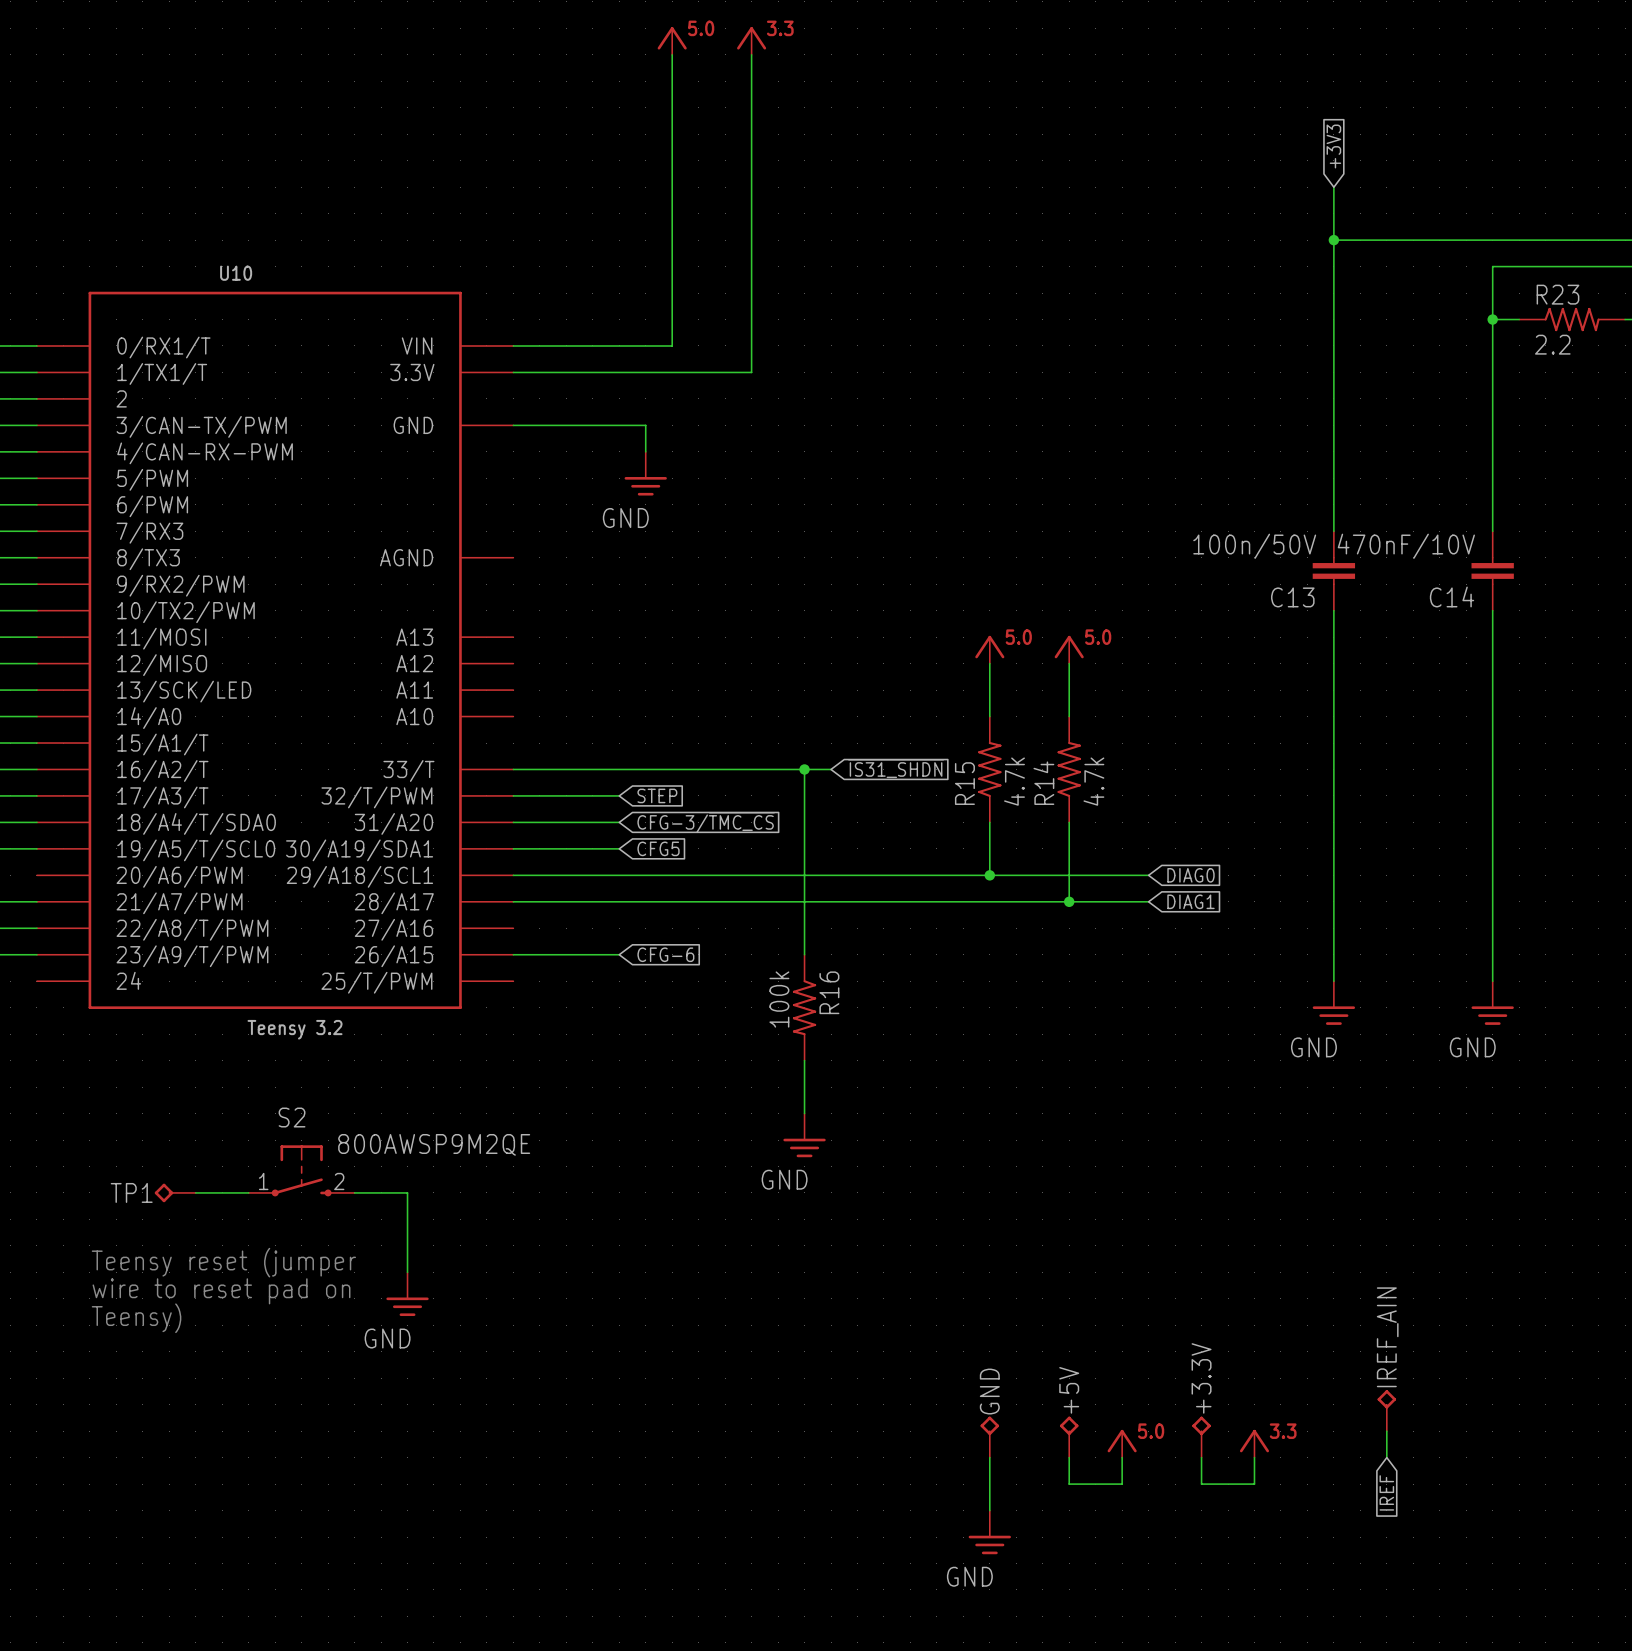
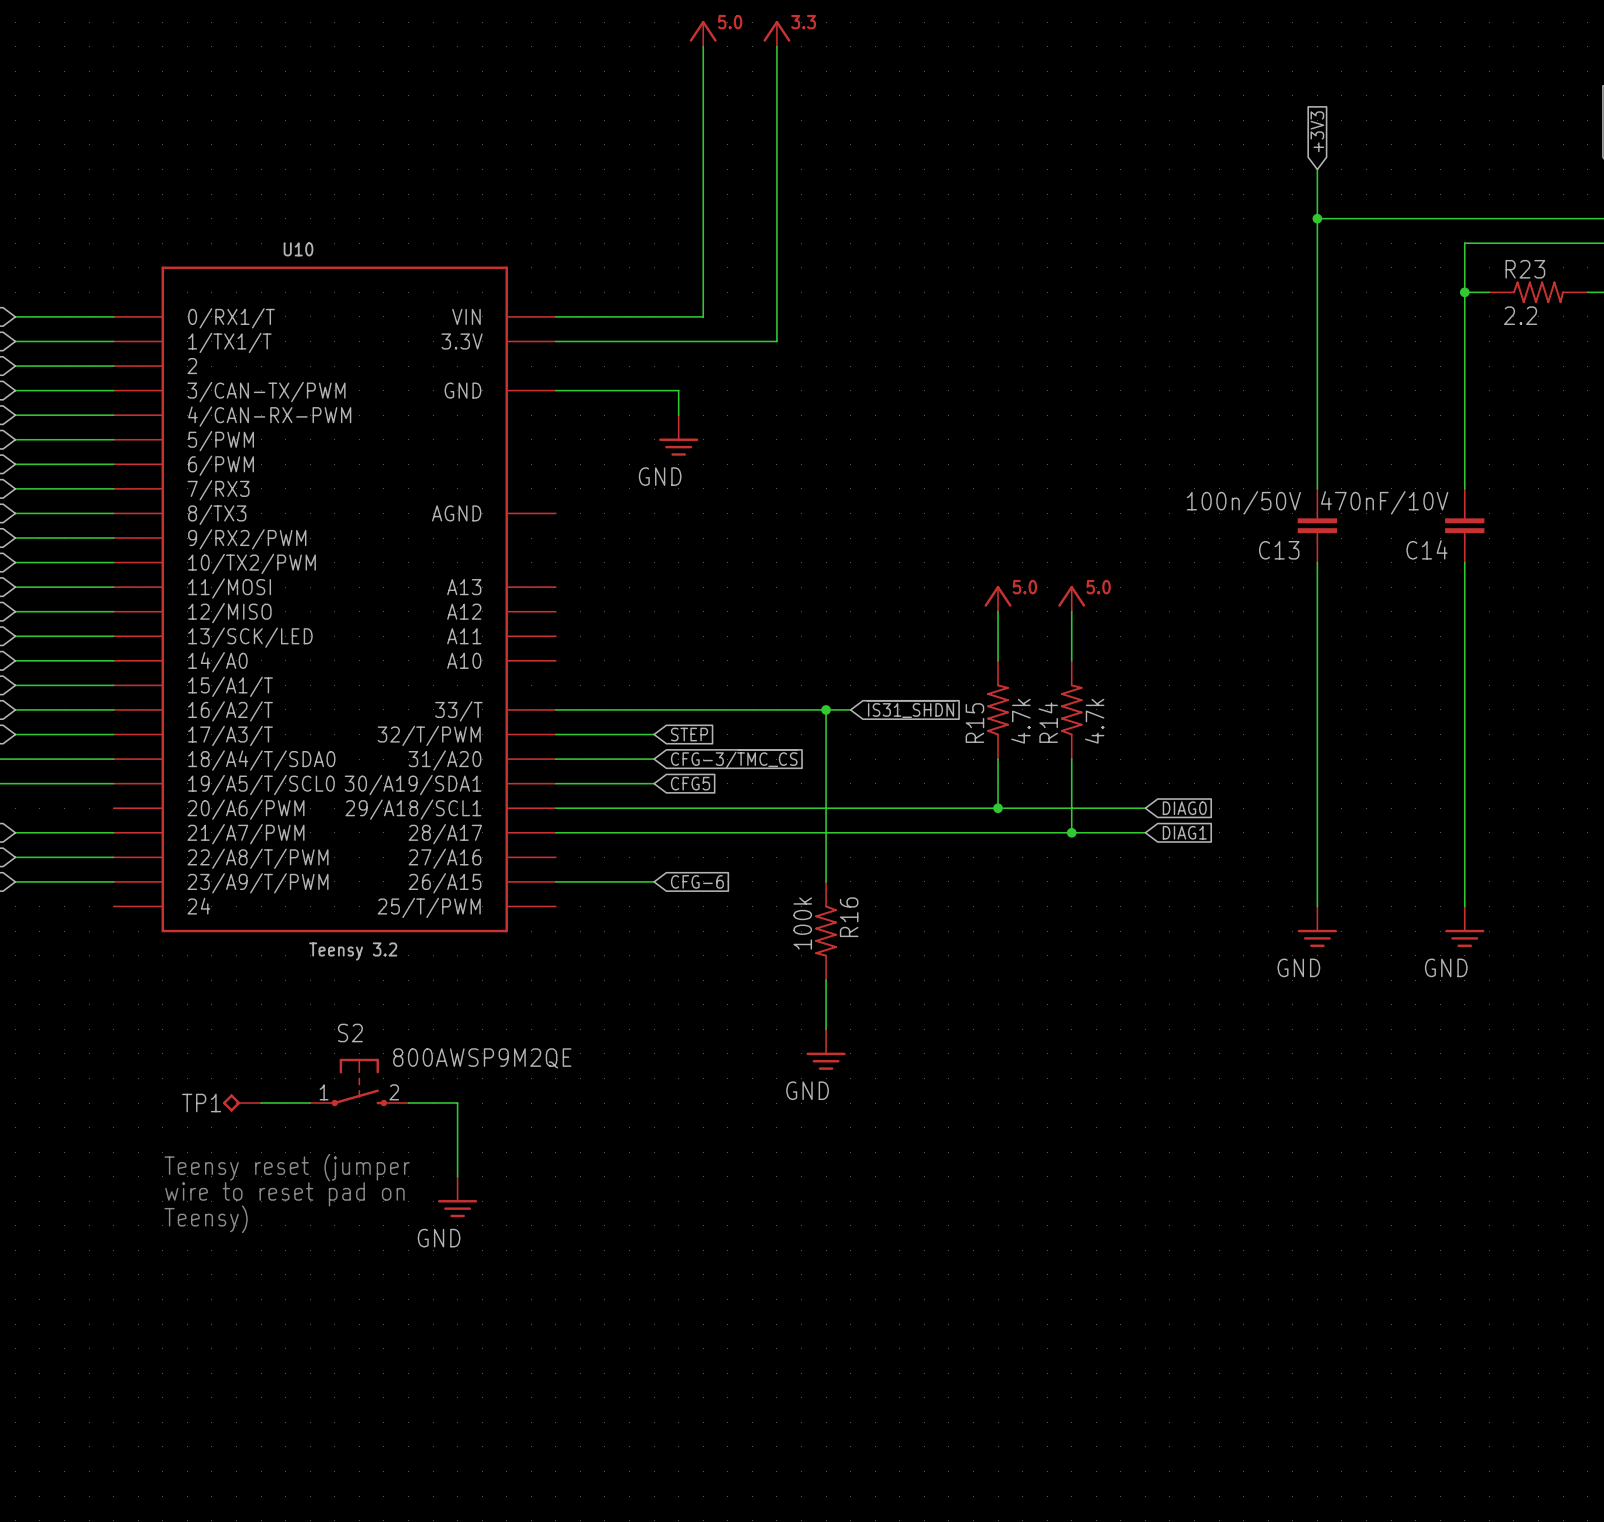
IREF_AIN: (1386, 1410) -> none
wire: (1386, 1431) (1386, 1457) -> none
GND: (989, 1437) -> none
+5V: (1069, 1437) -> none
+3.3V: (1201, 1437) -> none
power symbol: (1122, 1443) -> none
power symbol: (1254, 1443) -> none
wire: (989, 1457) (989, 1510) -> none
wire: (1069, 1457) (1069, 1484) (1122, 1484) (1122, 1457) -> none
wire: (1201, 1457) (1201, 1484) (1254, 1484) (1254, 1457) -> none
global label: IREF (1386, 1492) -> none
power symbol: GND (989, 1532) -> none

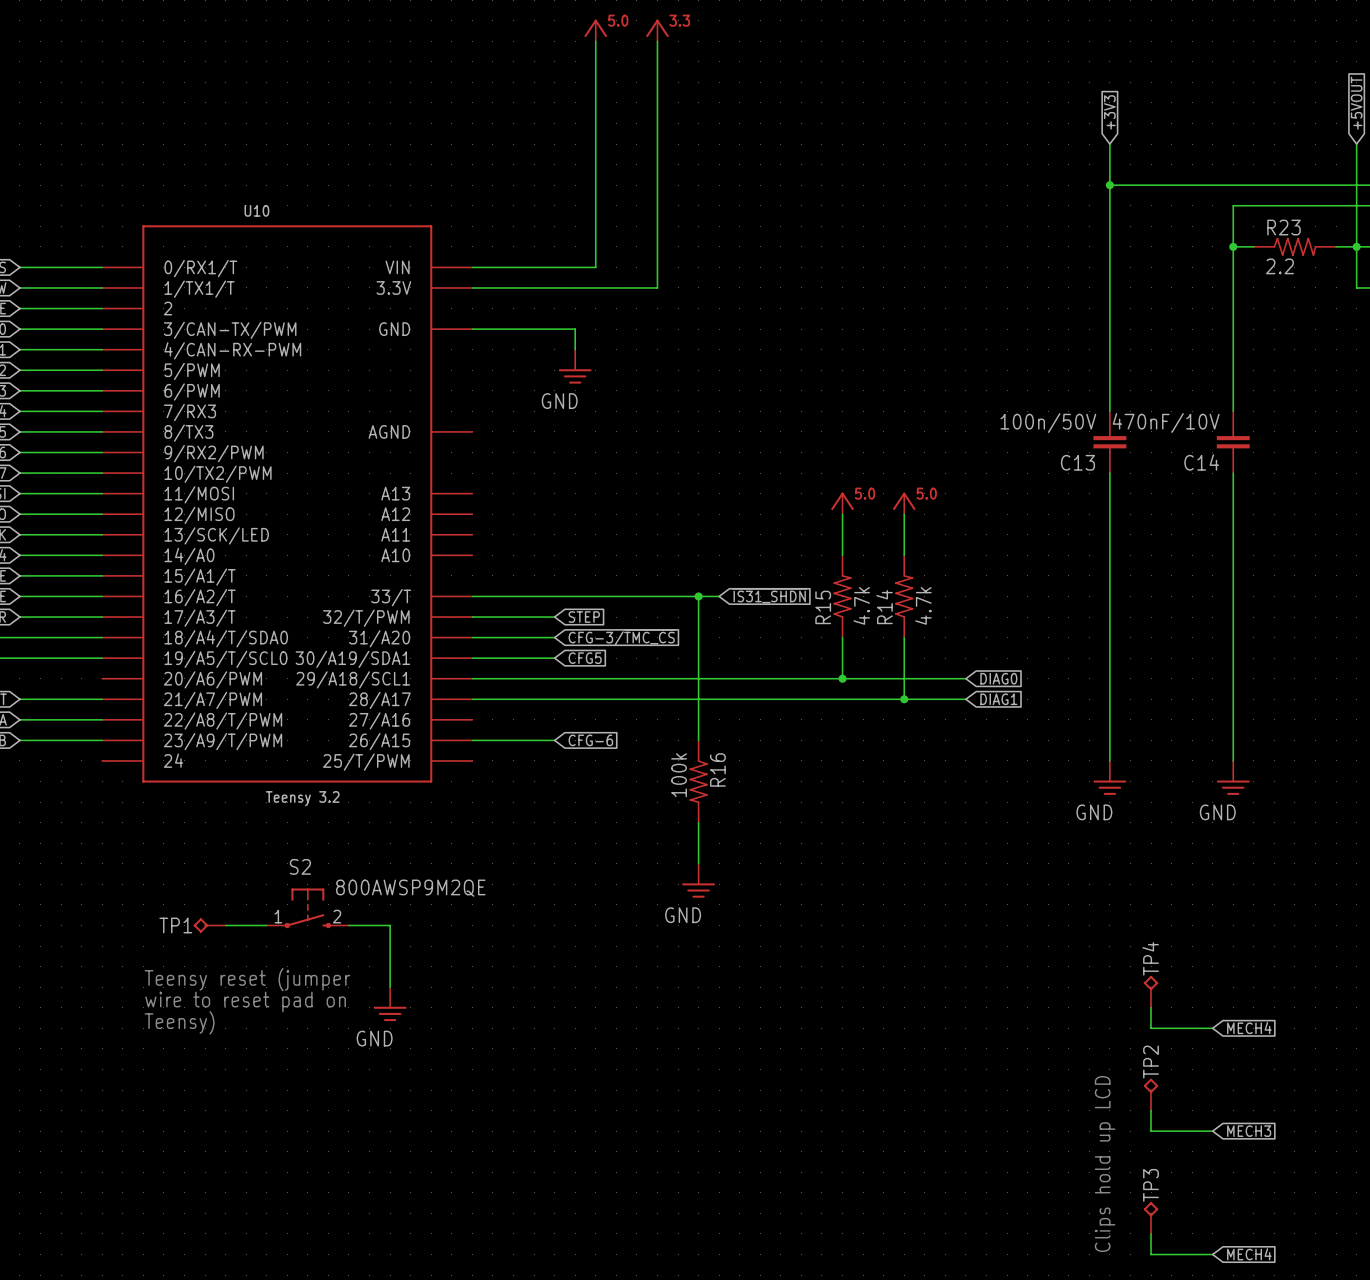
TP4: none -> (1151, 991)
wire: none -> (1151, 1007) (1151, 1028) (1212, 1028)
global label: none -> MECH4 (1249, 1028)
TP2: none -> (1151, 1094)
wire: none -> (1151, 1110) (1151, 1131) (1212, 1131)
global label: none -> MECH3 (1249, 1131)
text: none -> Clips hold up LCD (1105, 1164)
TP3: none -> (1151, 1218)
wire: none -> (1151, 1233) (1151, 1254) (1212, 1254)
global label: none -> MECH4 (1249, 1254)

